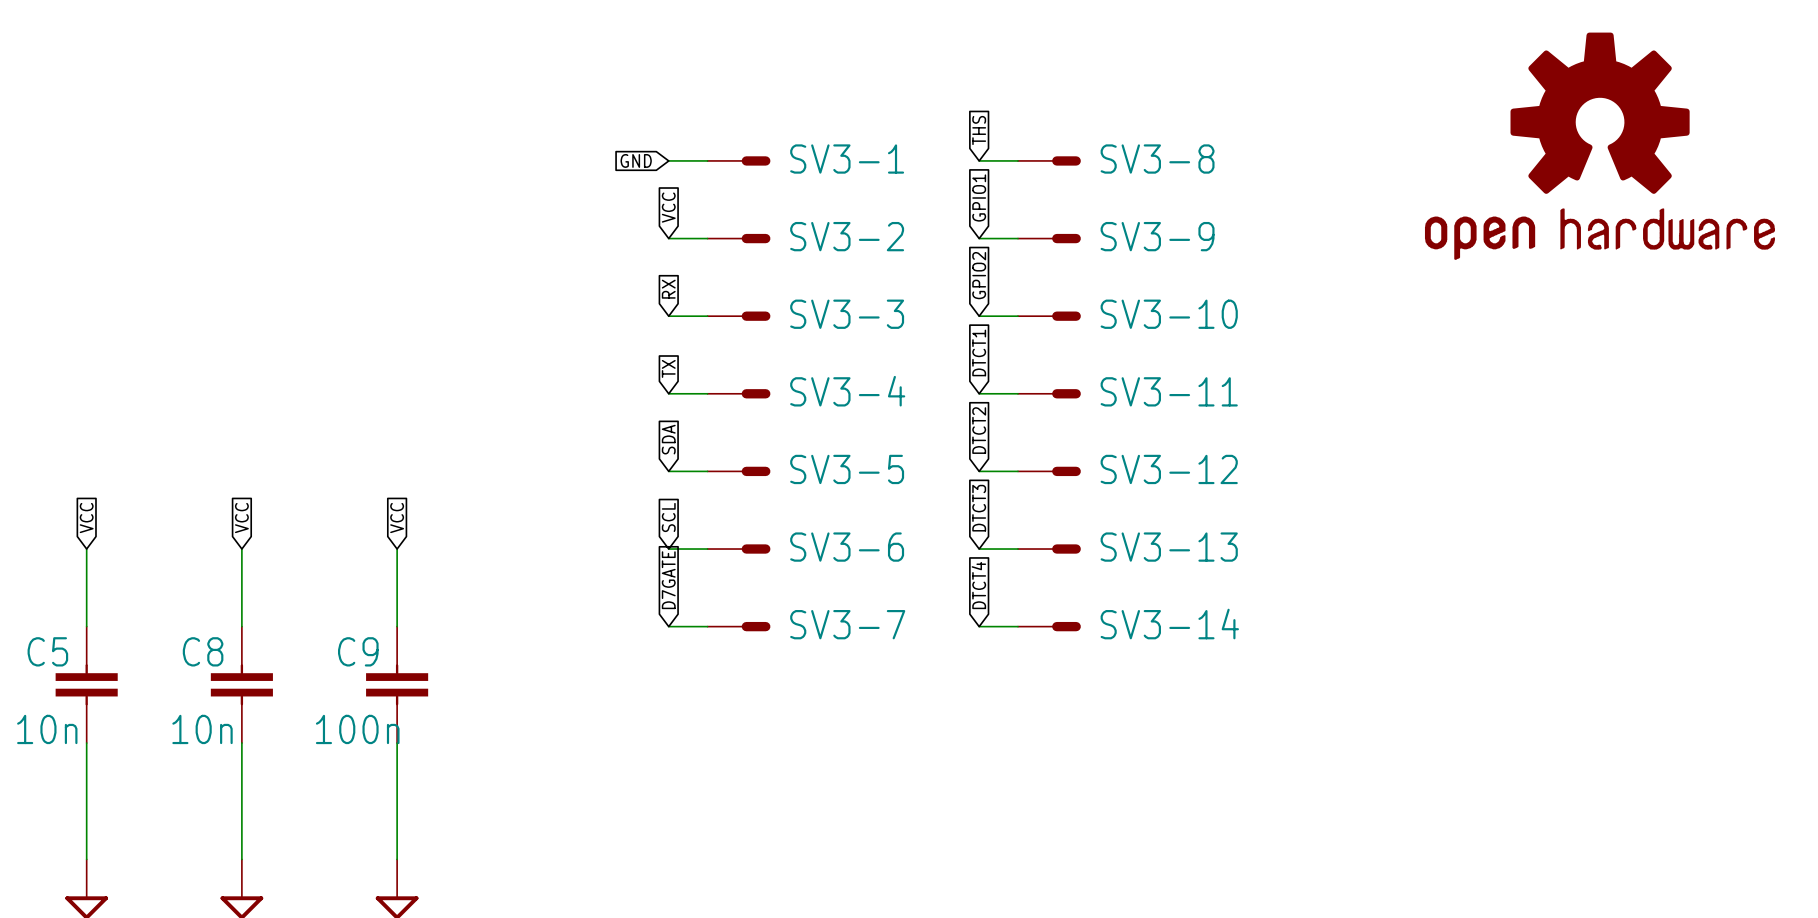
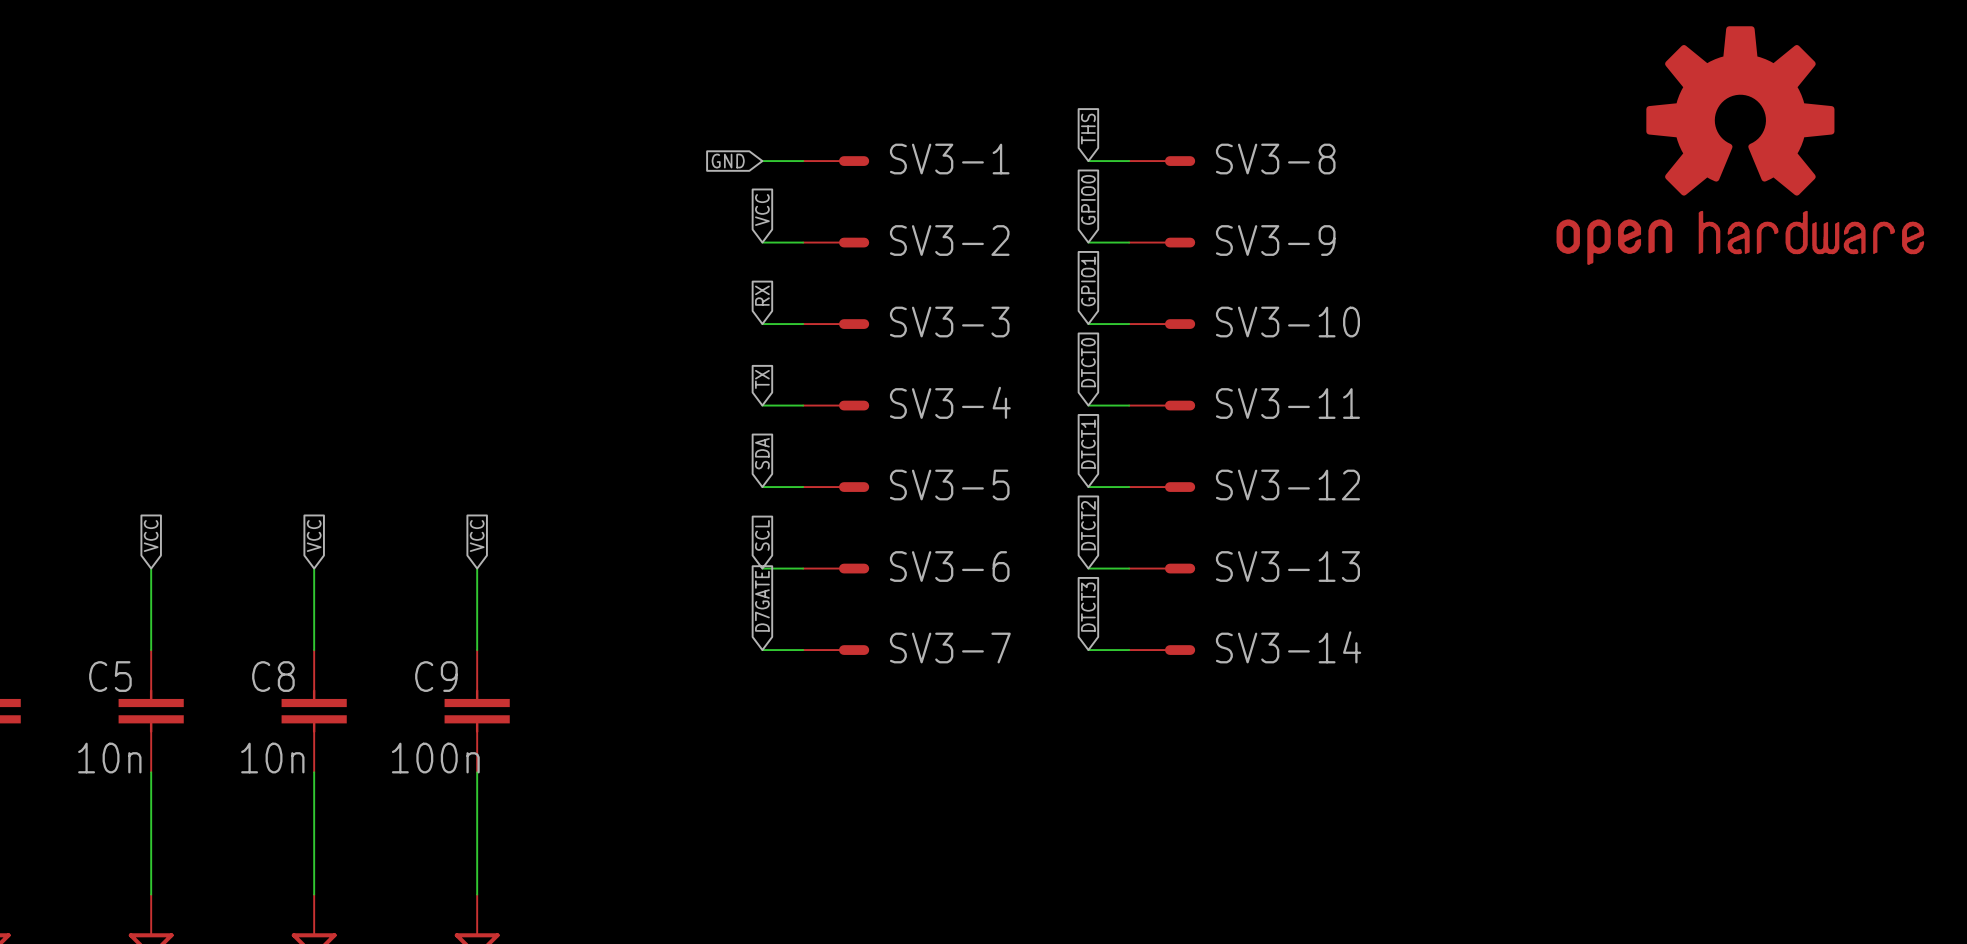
global label: GPIO1 (979, 198) -> GPIO0 (1088, 199)
global label: GPIO2 (979, 275) -> GPIO1 (1088, 281)
global label: DTCT1 (979, 352) -> DTCT0 (1088, 362)
global label: DTCT2 (979, 430) -> DTCT1 (1088, 444)
global label: DTCT3 (979, 508) -> DTCT2 (1088, 525)
global label: DTCT4 (978, 585) -> DTCT3 (1088, 607)

